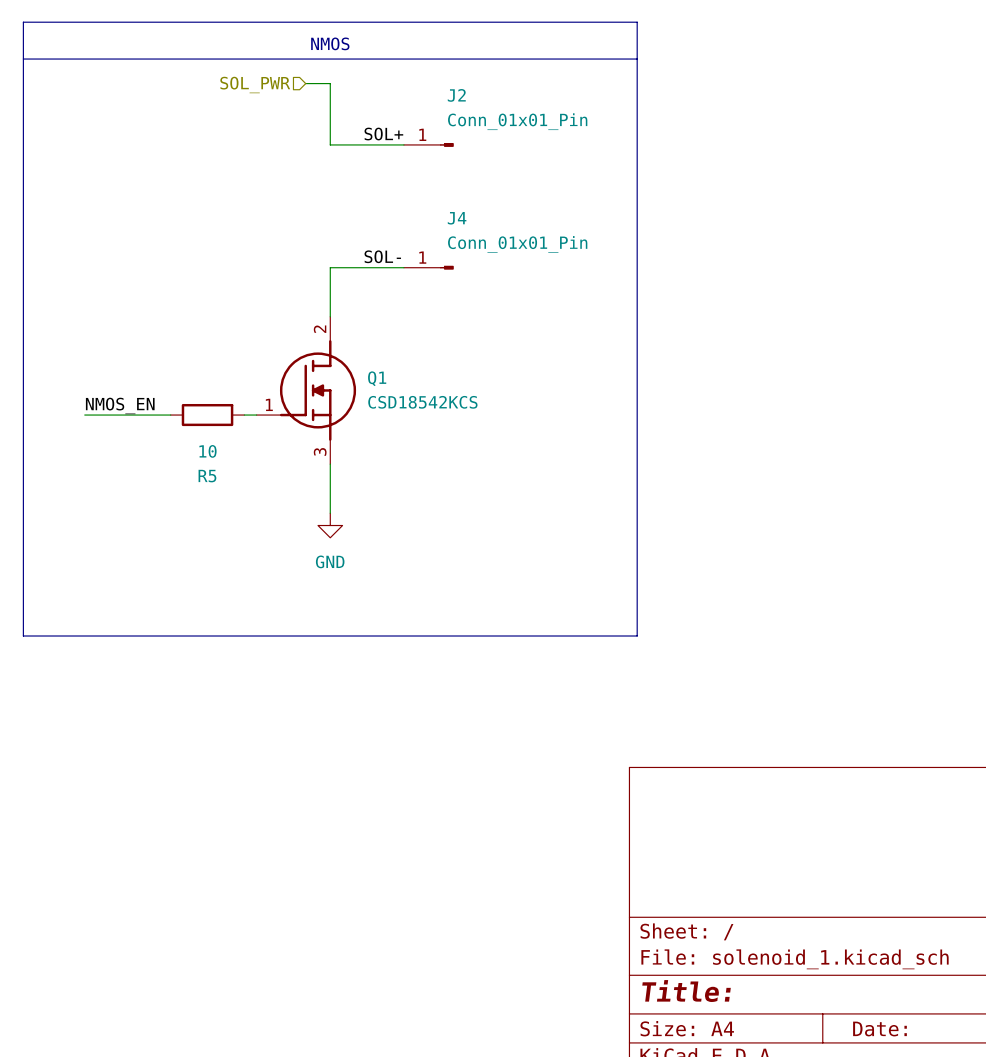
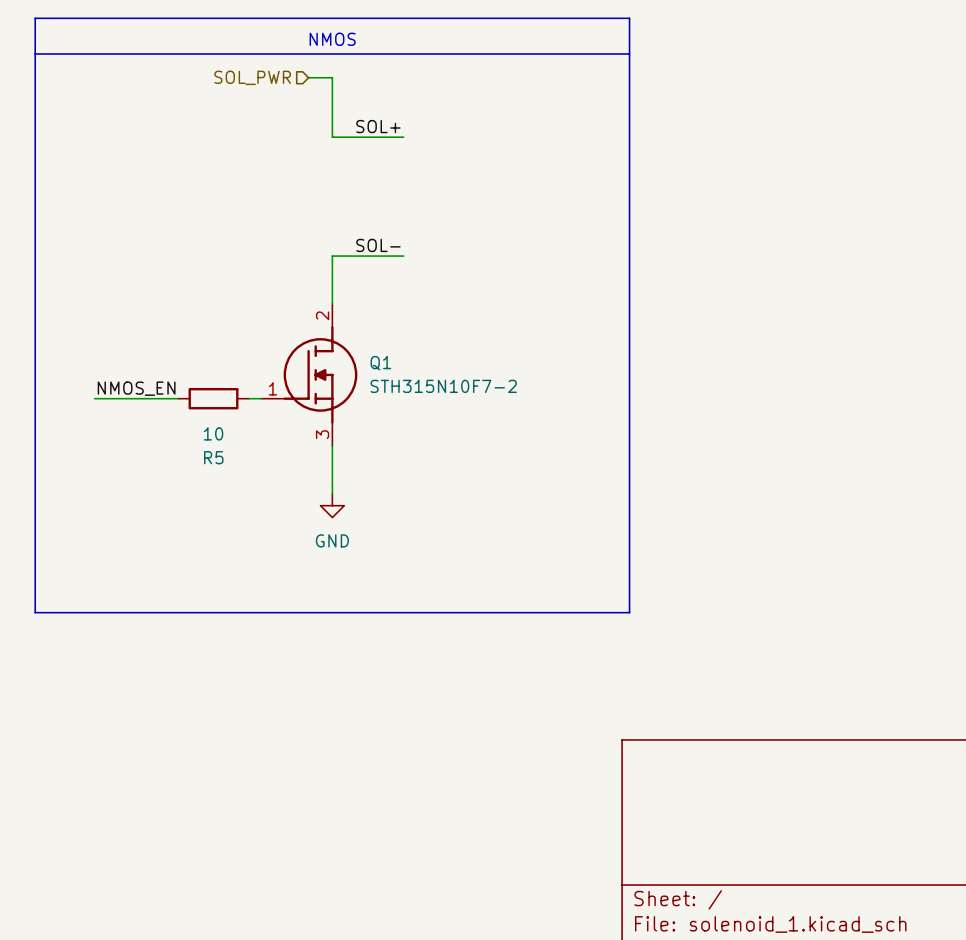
J2: Conn_01x01_Pin (428, 144) -> none
J4: Conn_01x01_Pin (428, 267) -> none
Q1 value: CSD18542KCS (422, 402) -> STH315N10F7-2 (443, 386)

